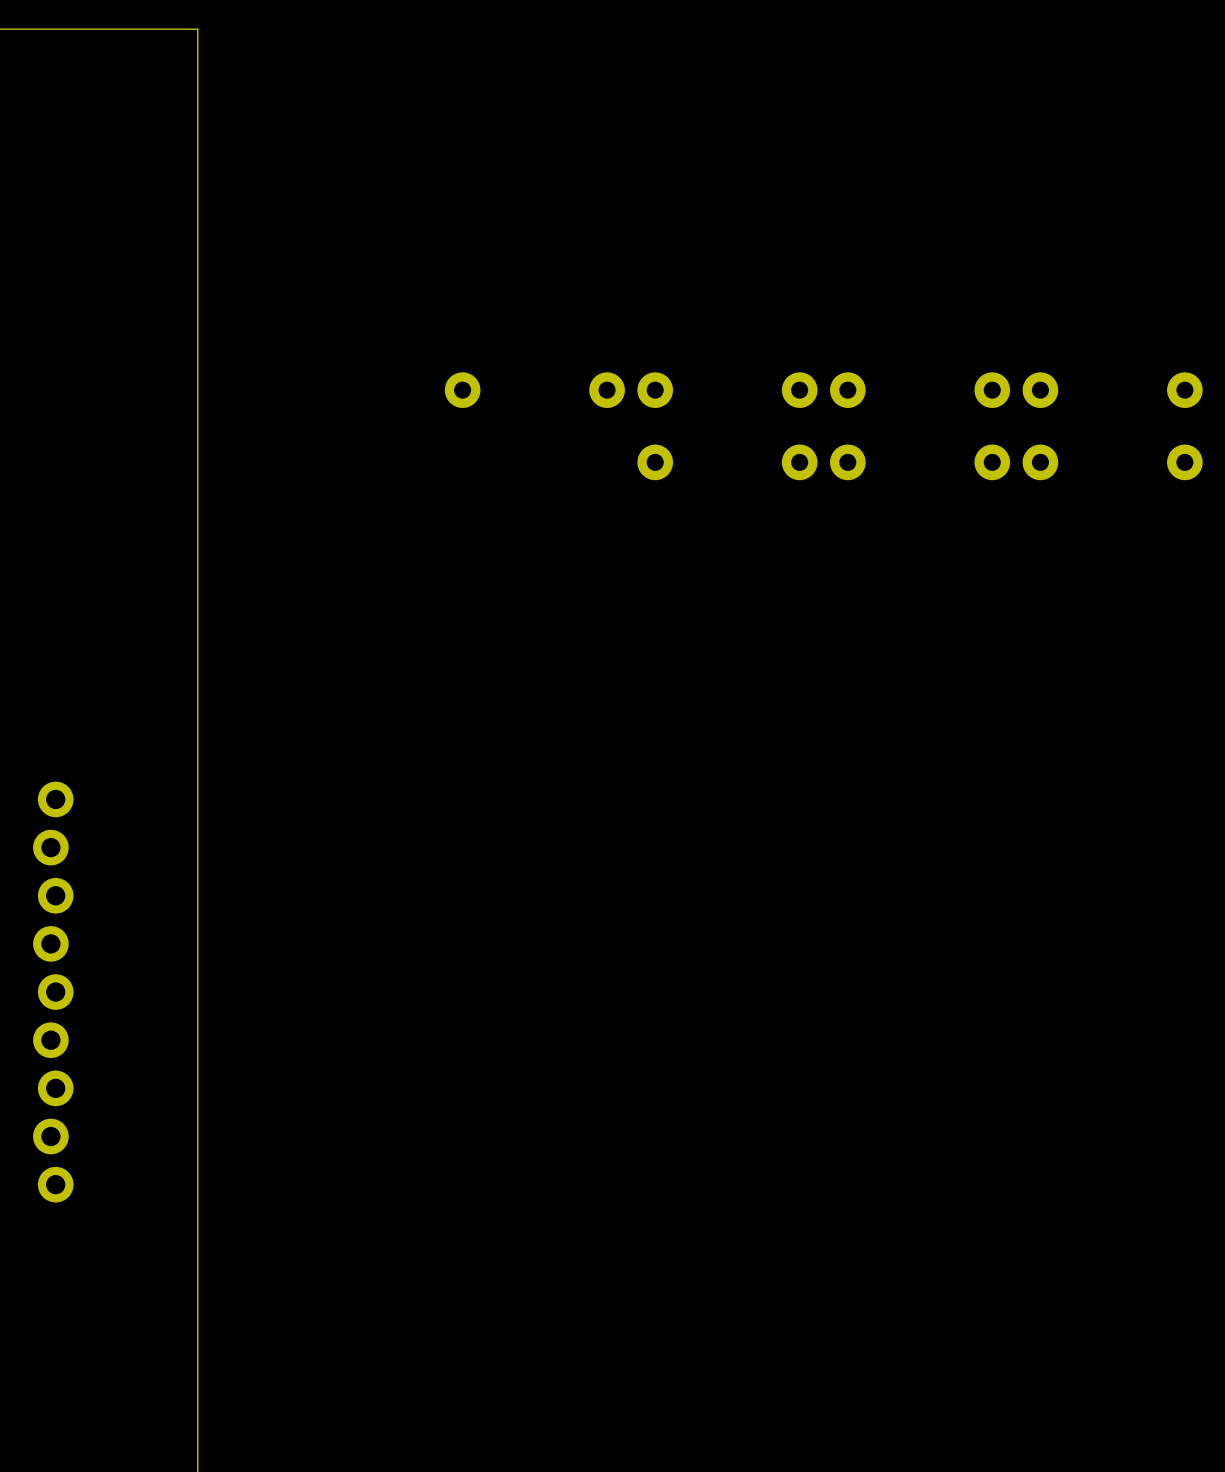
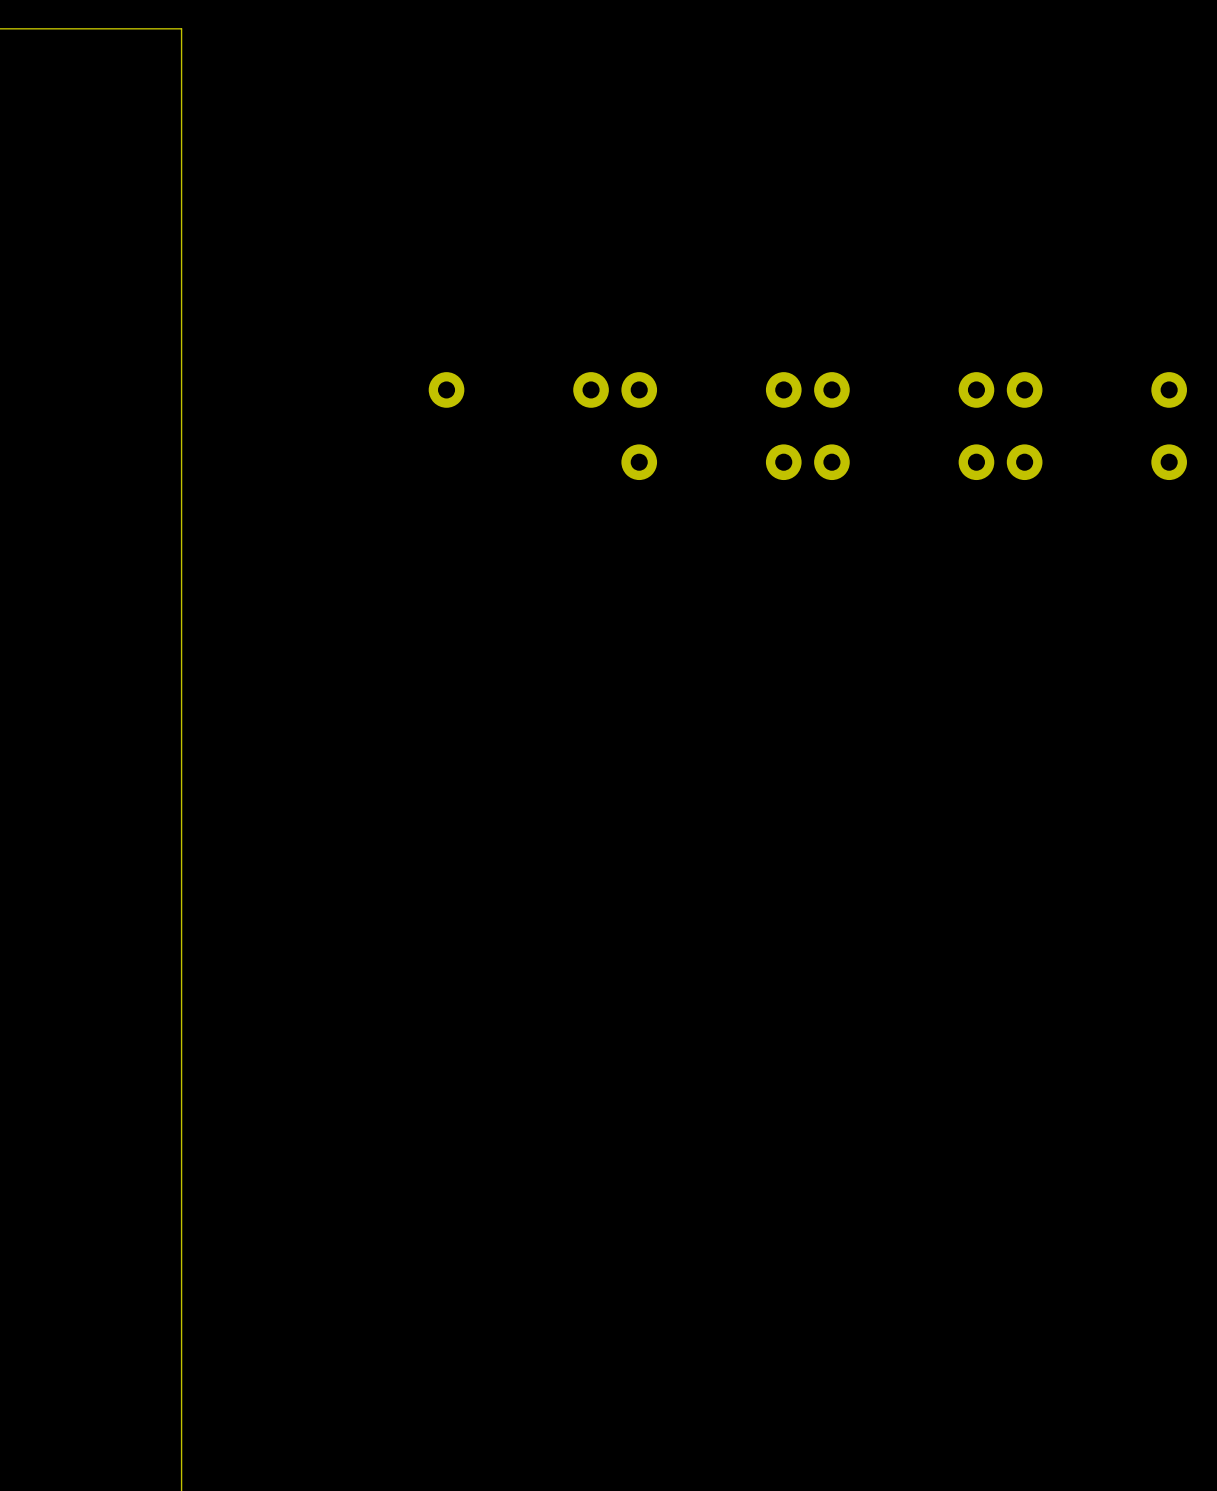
part: (53, 992) -> none

